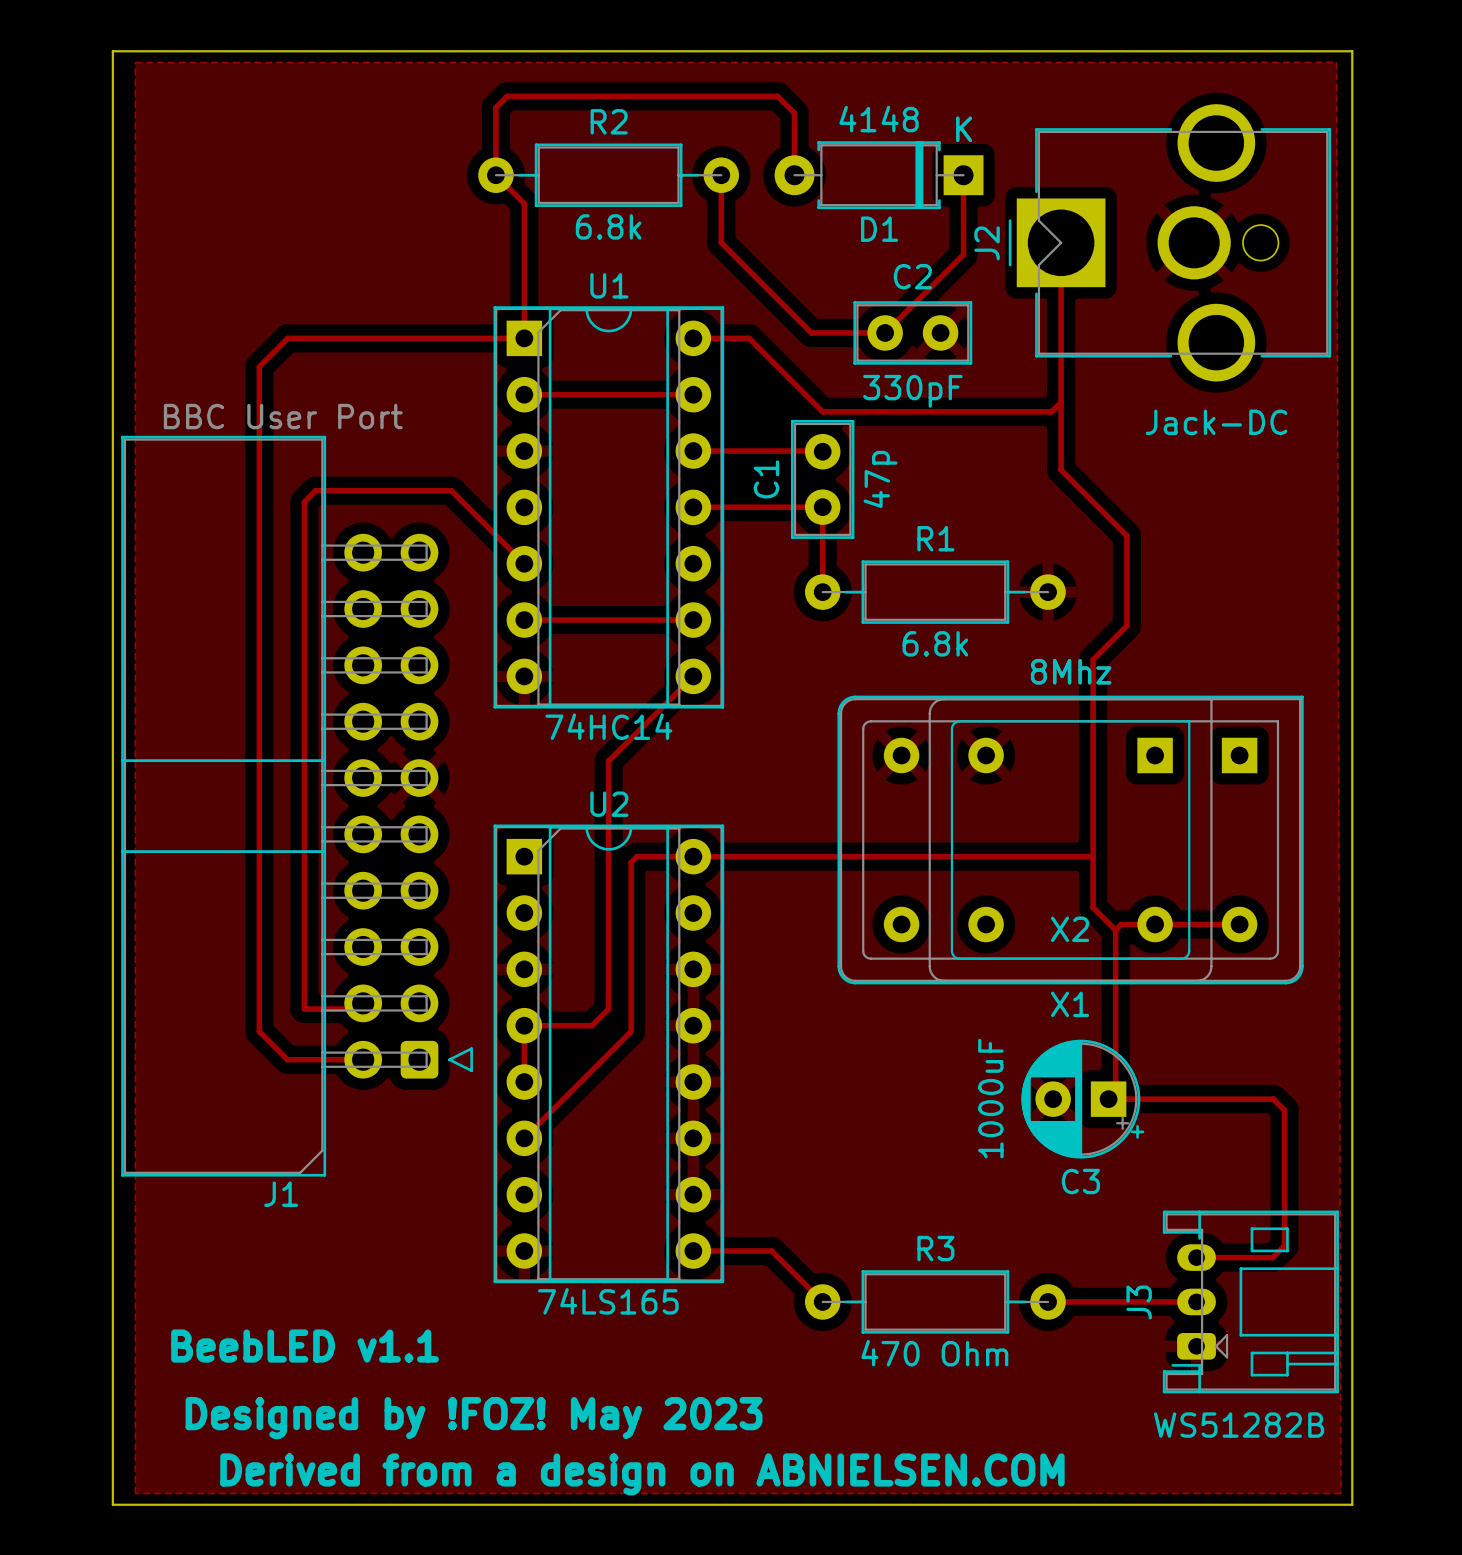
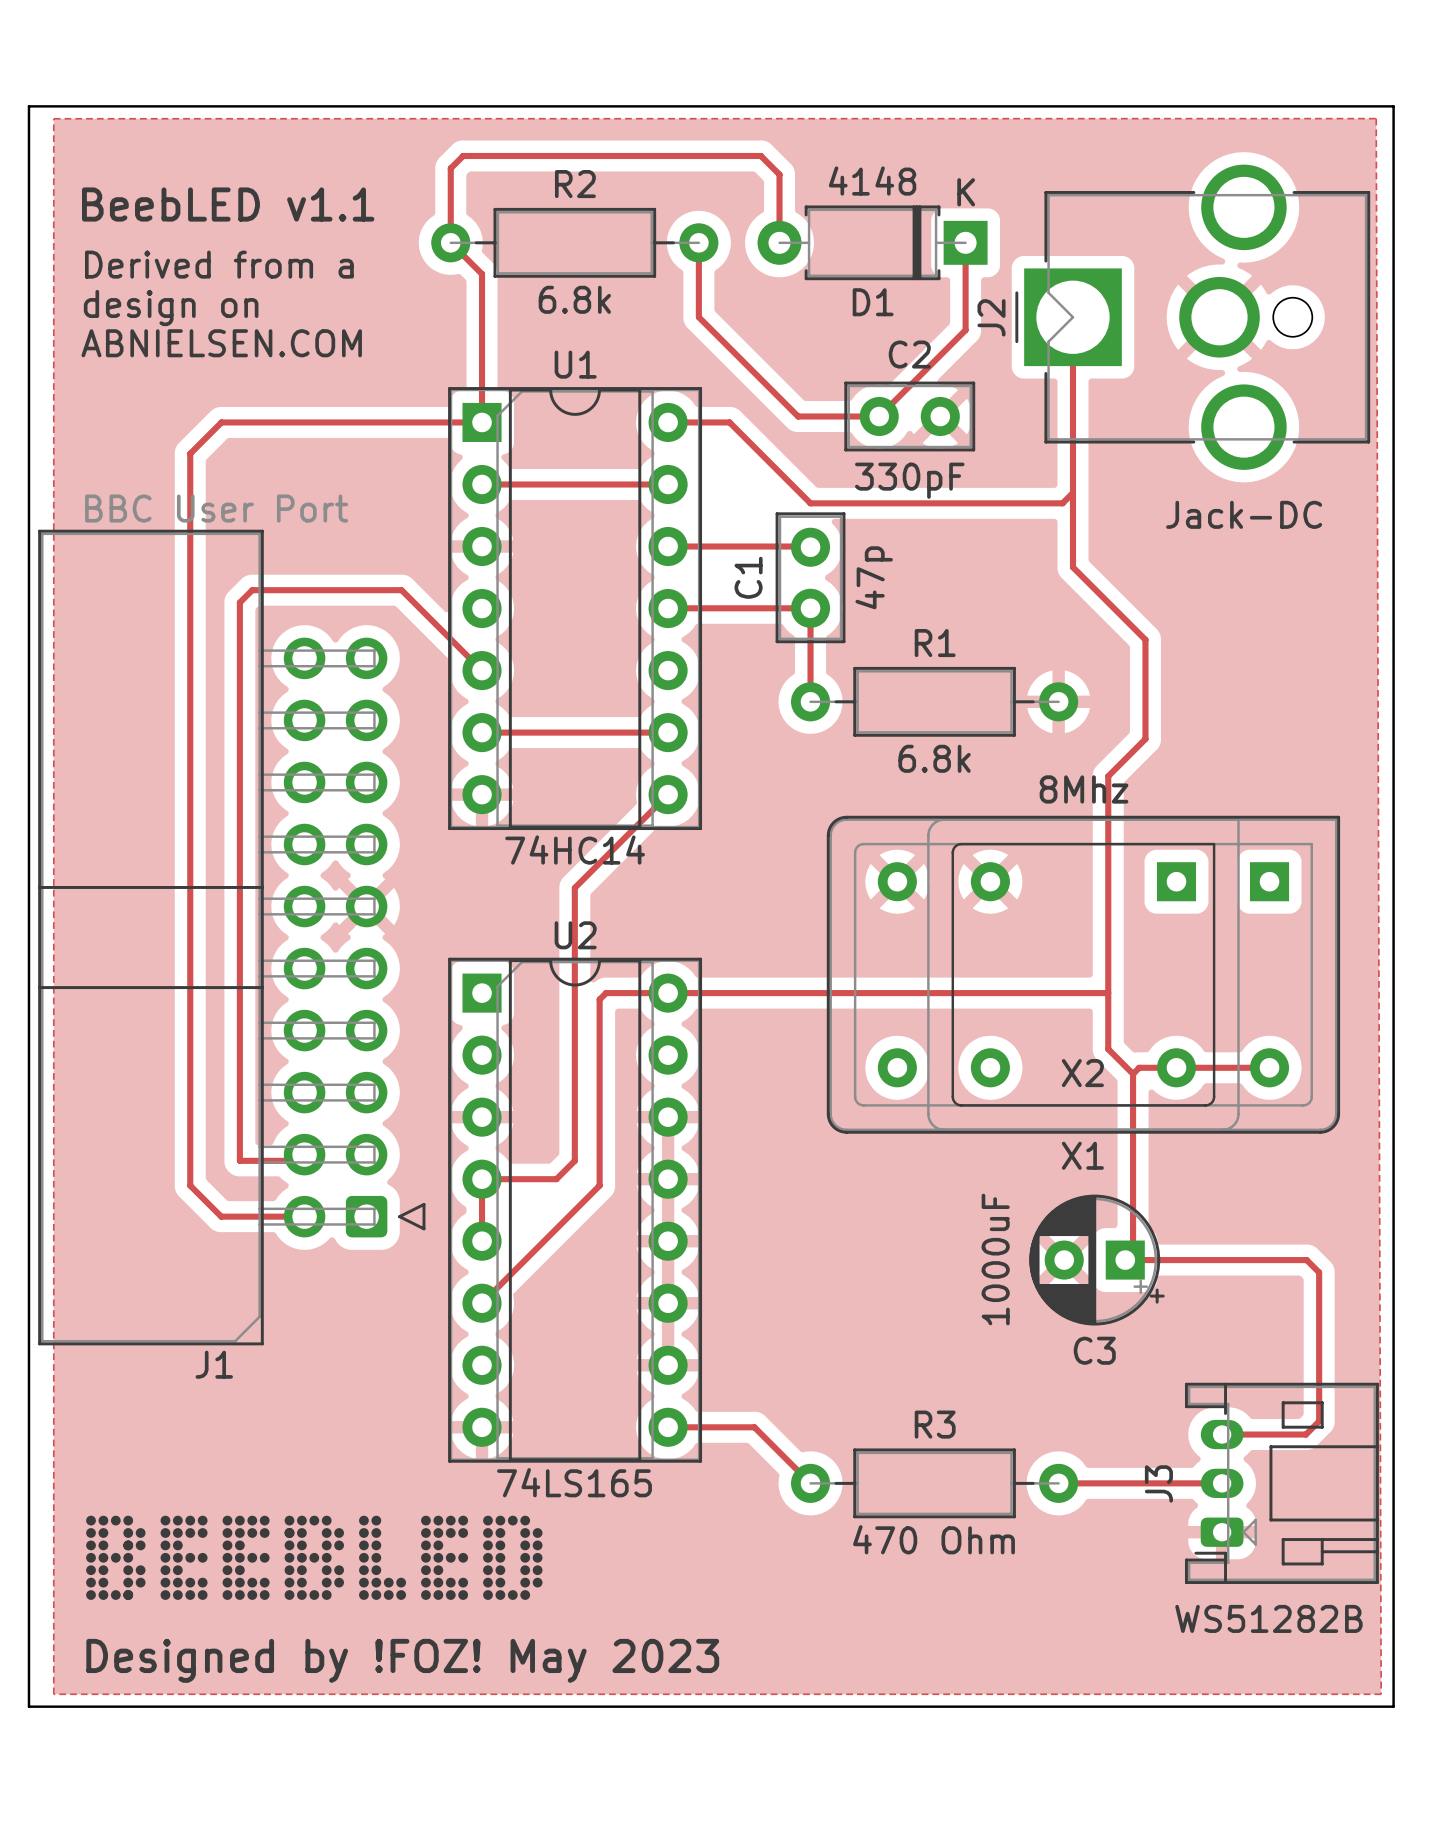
text: none -> BeebLED v1.1 (228, 204)
text: none -> Derived from a (219, 264)
text: none -> design on (171, 308)
text: none -> ABNIELSEN.COM (221, 343)
drawing: none -> [86, 1515, 543, 1600]
text: BeebLED v1.1 (305, 1346) -> none
text position: Designed by !FOZ! May 2023 (474, 1418) -> Designed by !FOZ! May 2023 (402, 1660)
text: Derived from a design on ABNIELSEN.COM (642, 1474) -> none

